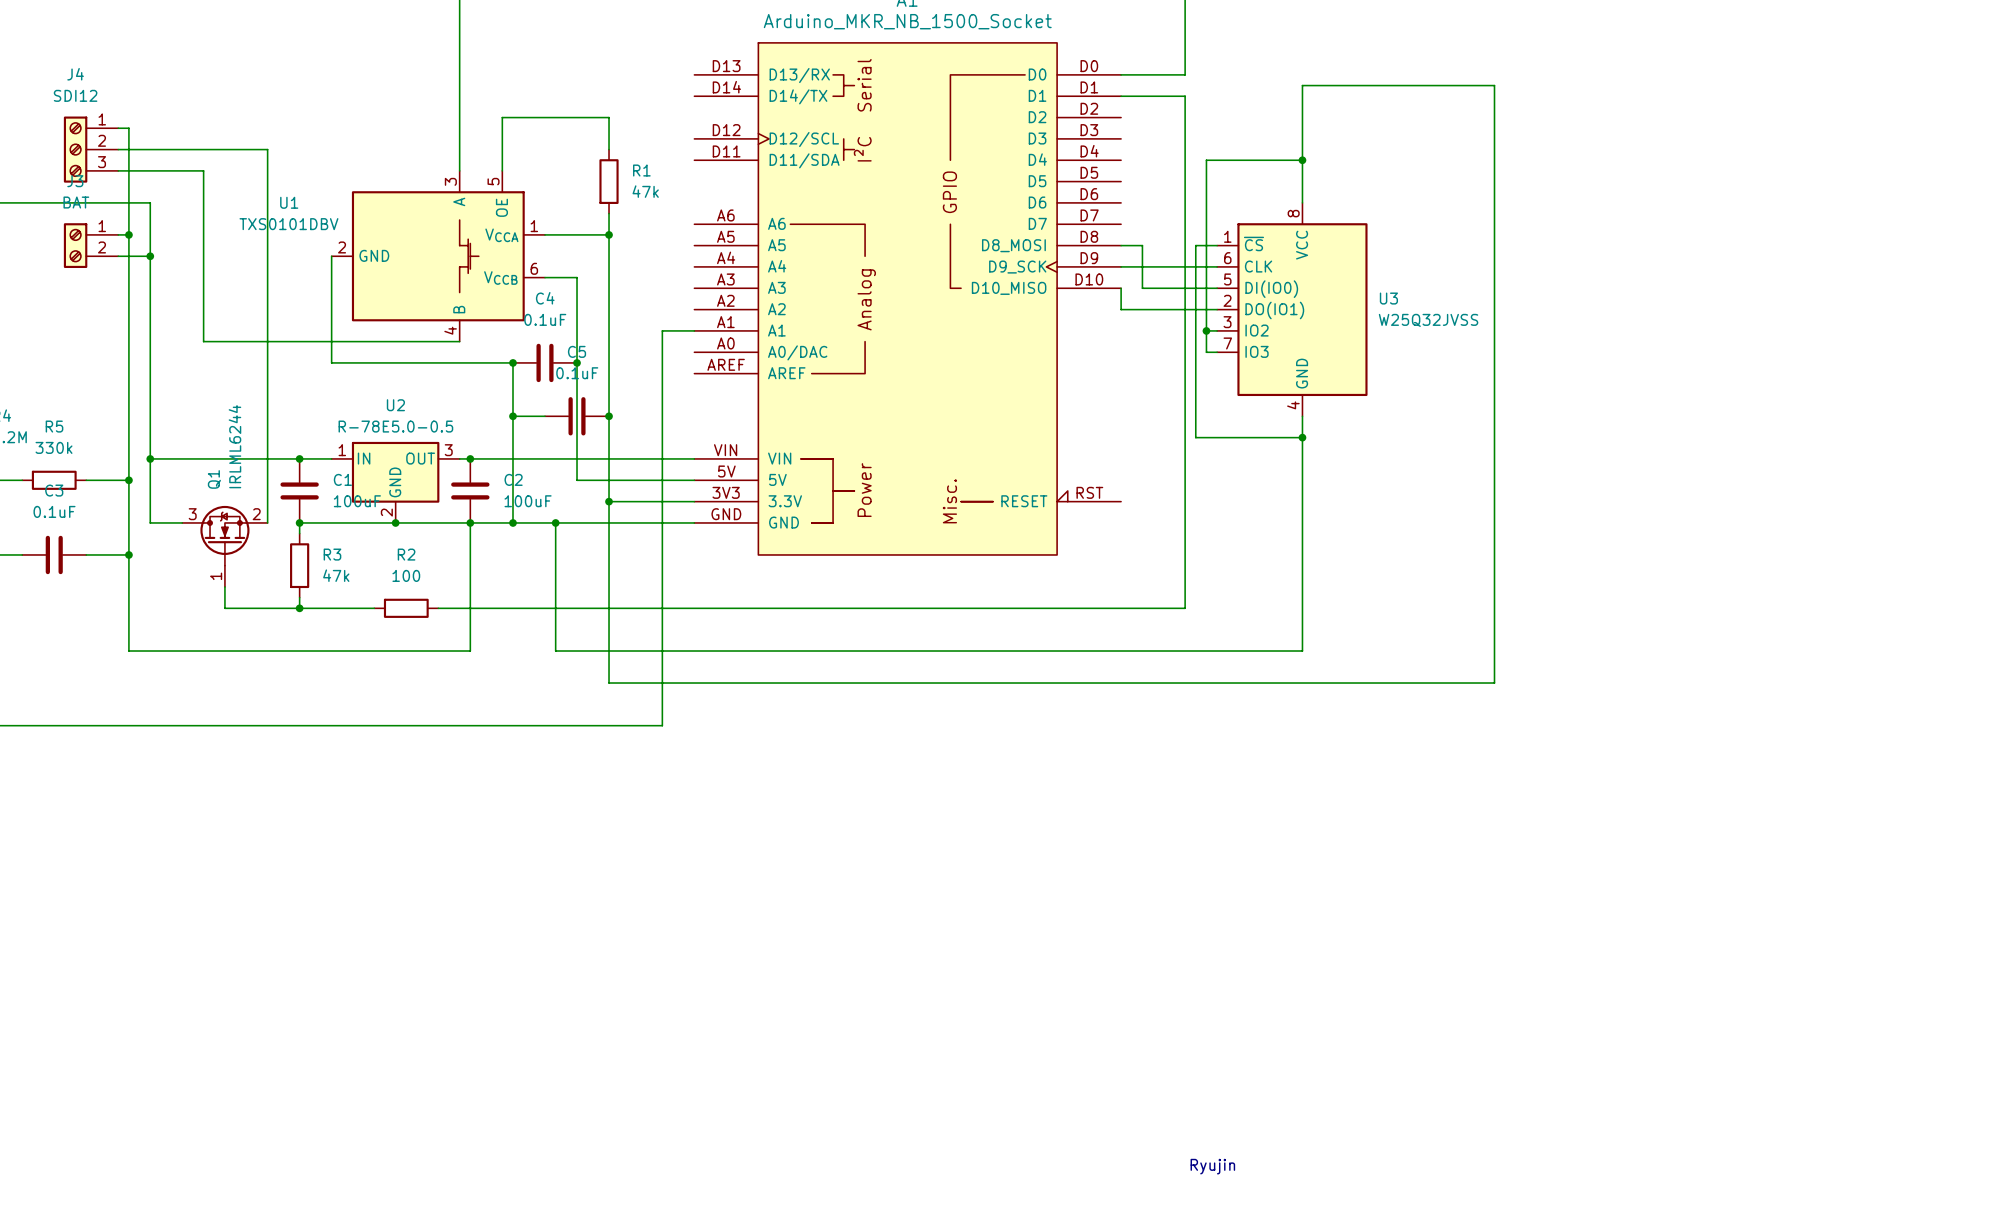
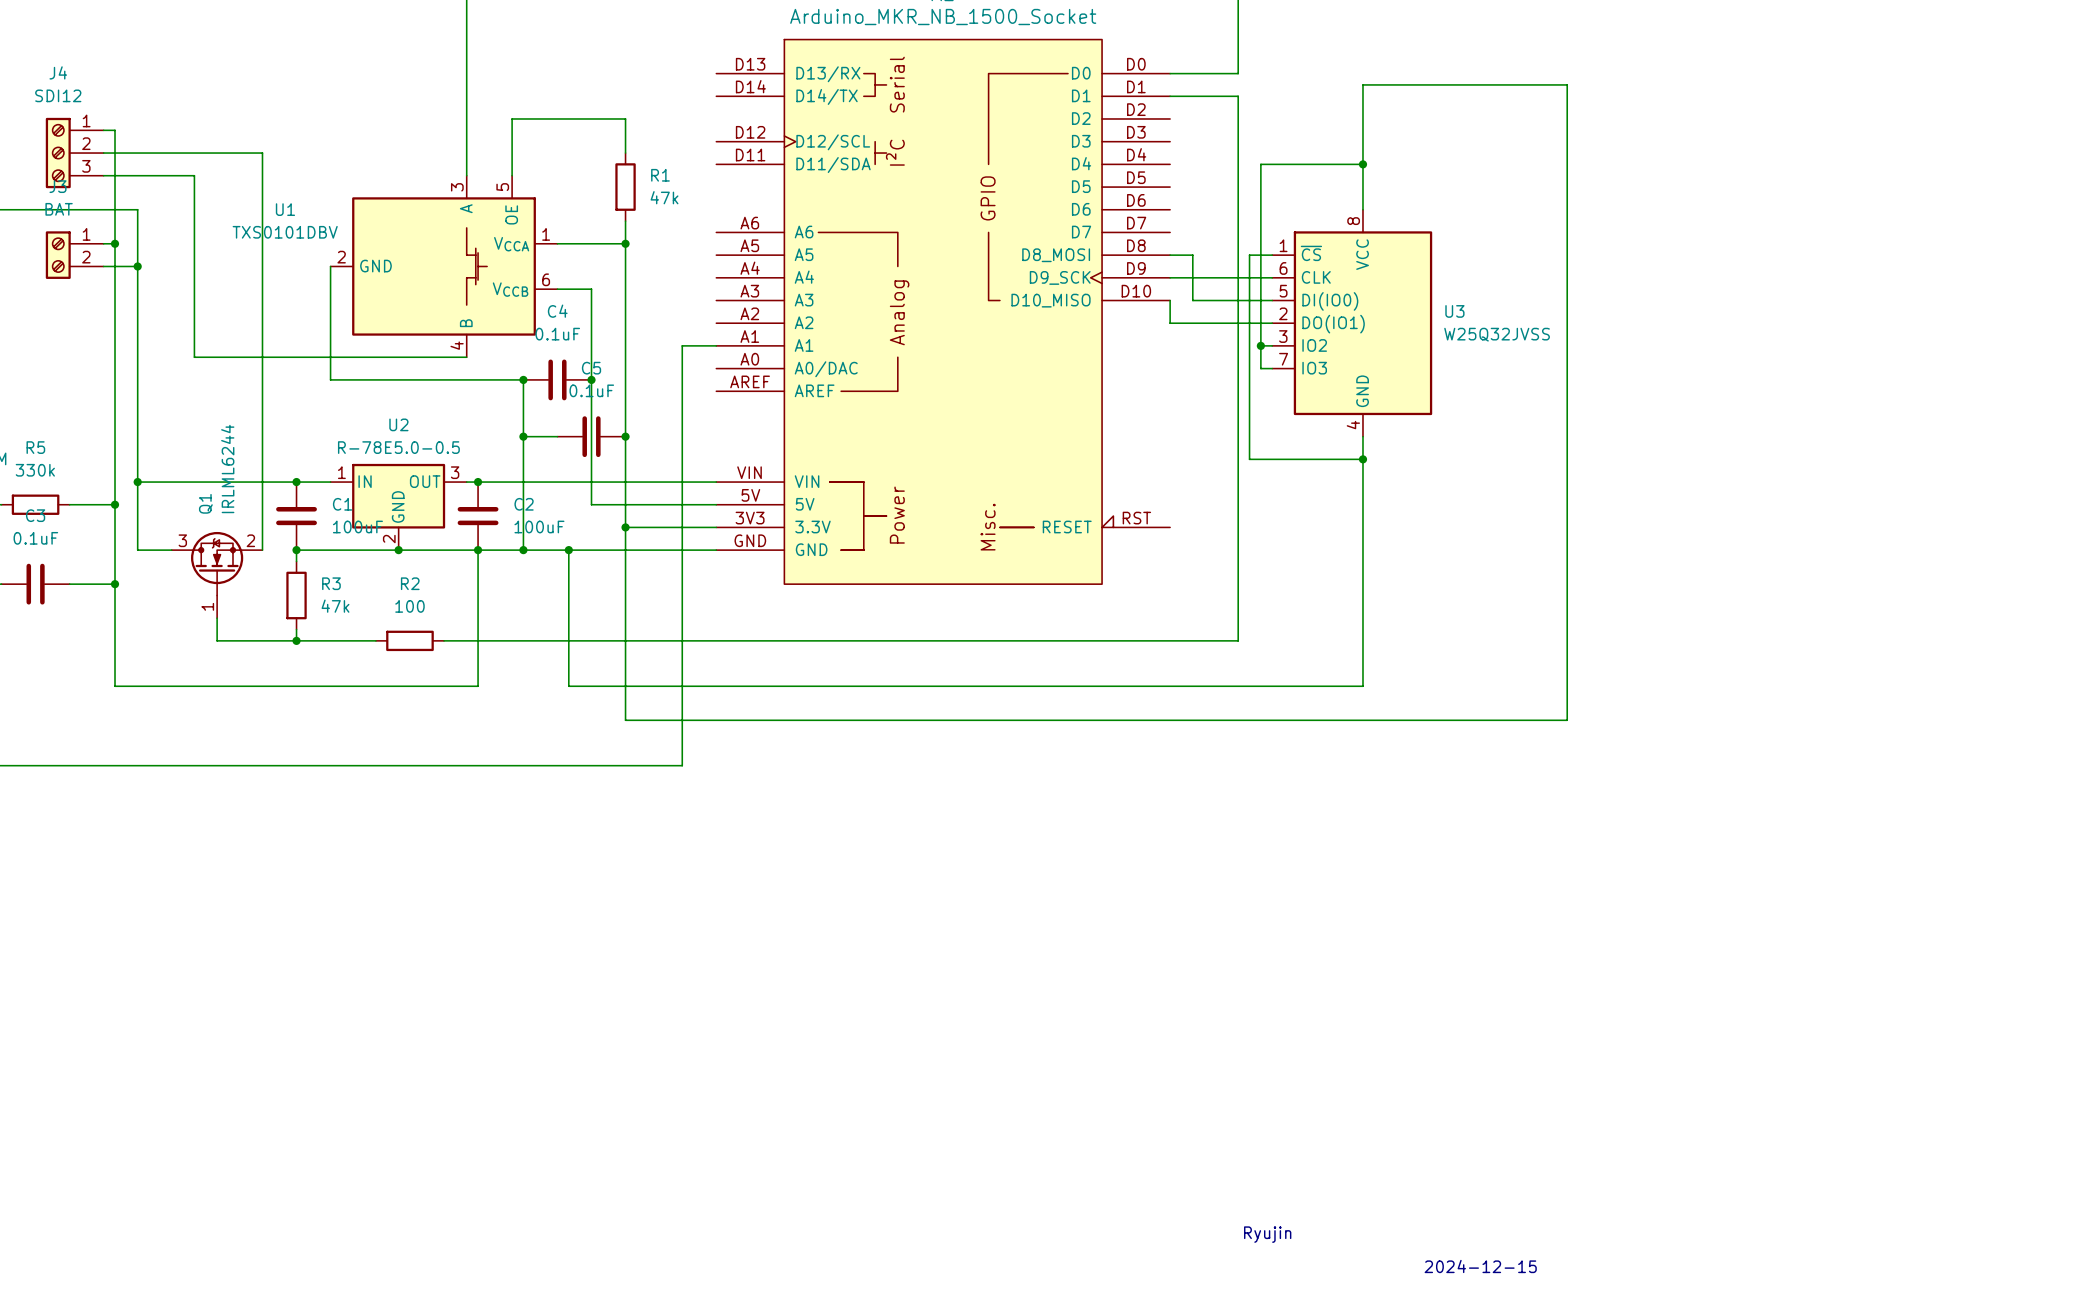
text: none -> 2024-12-15 (1480, 1266)

